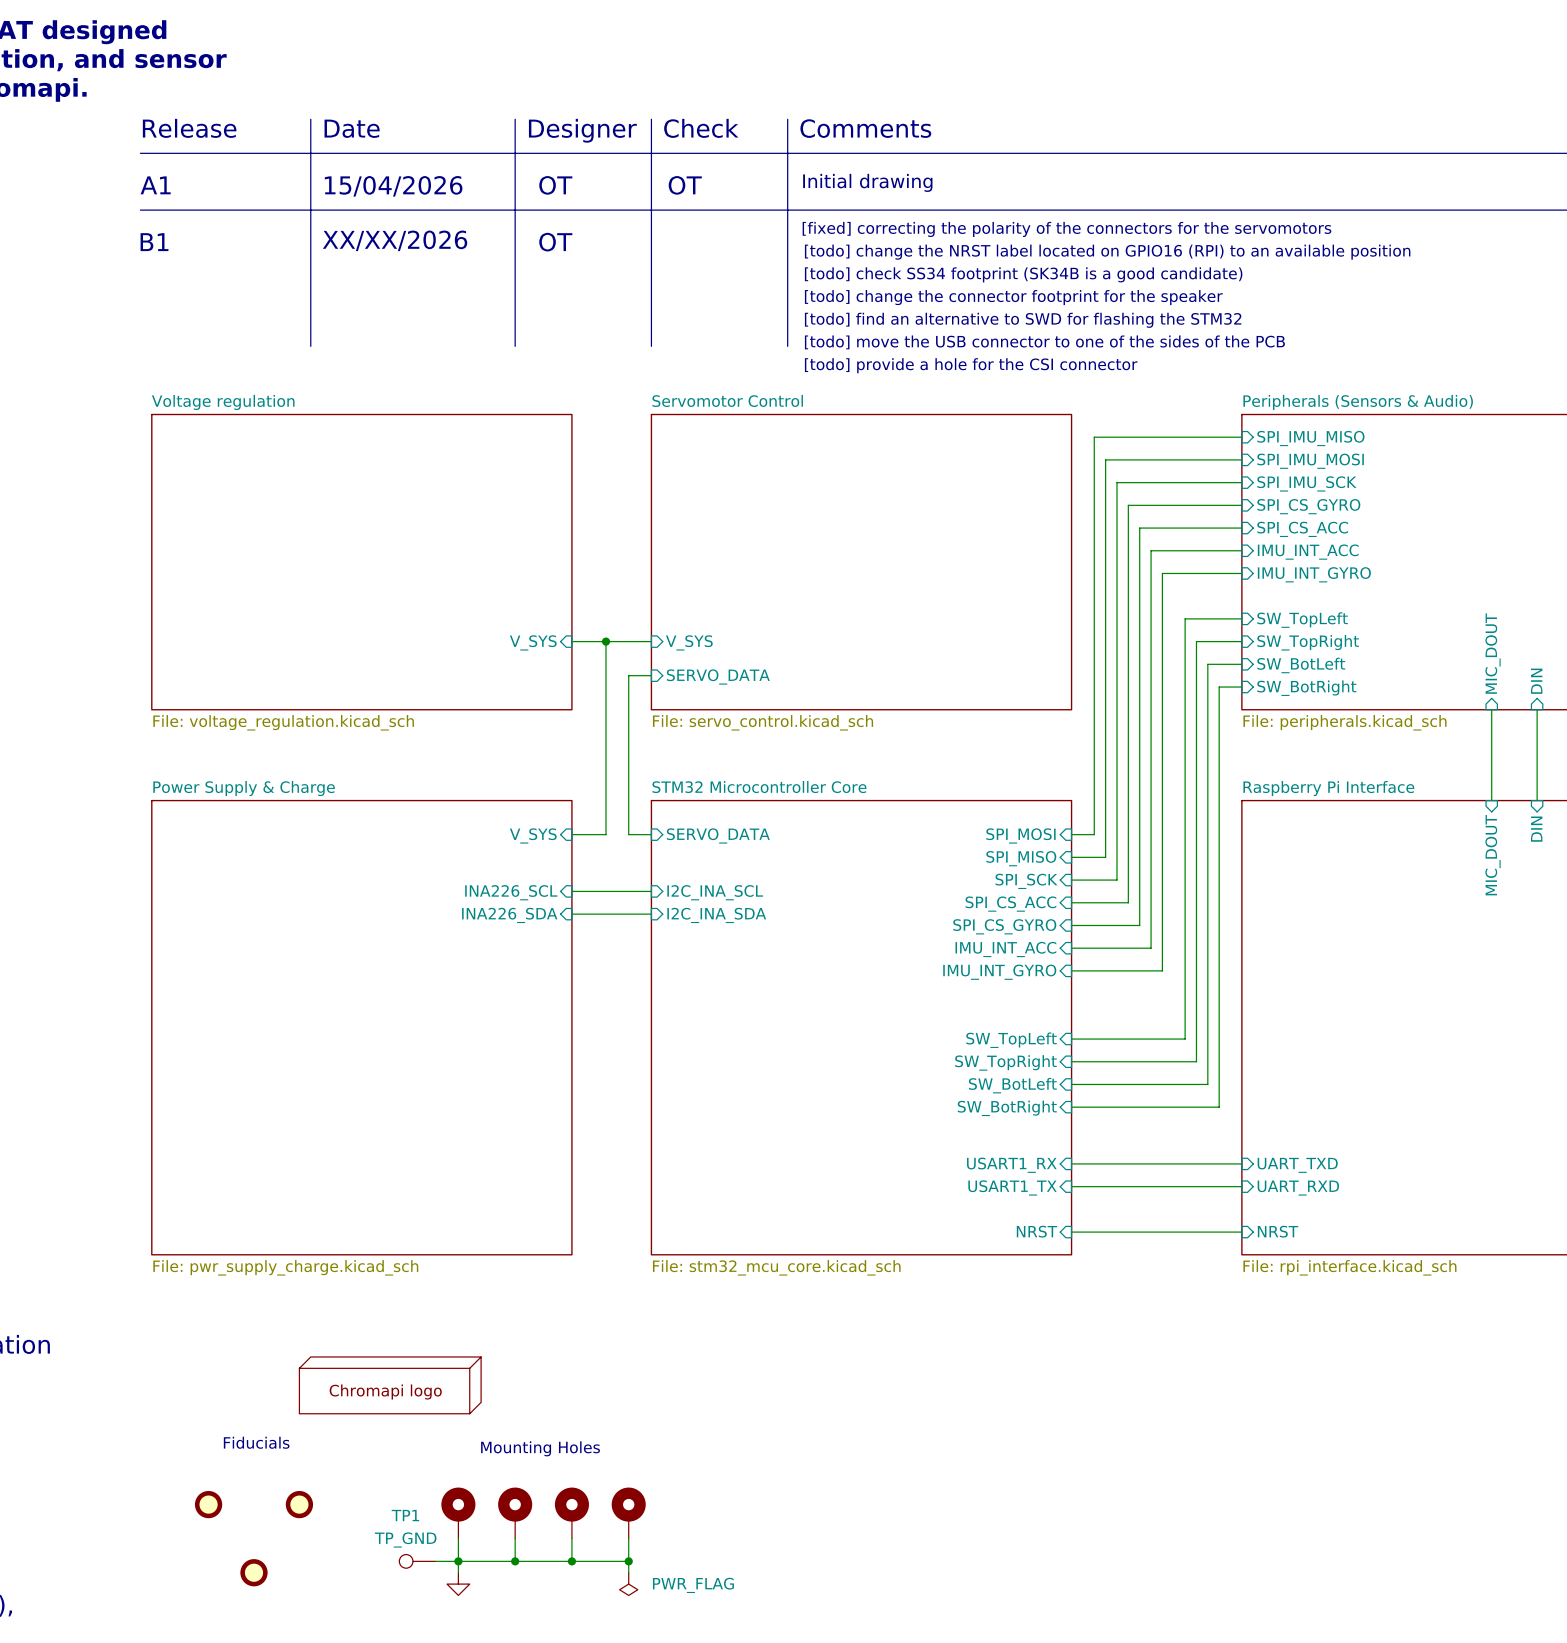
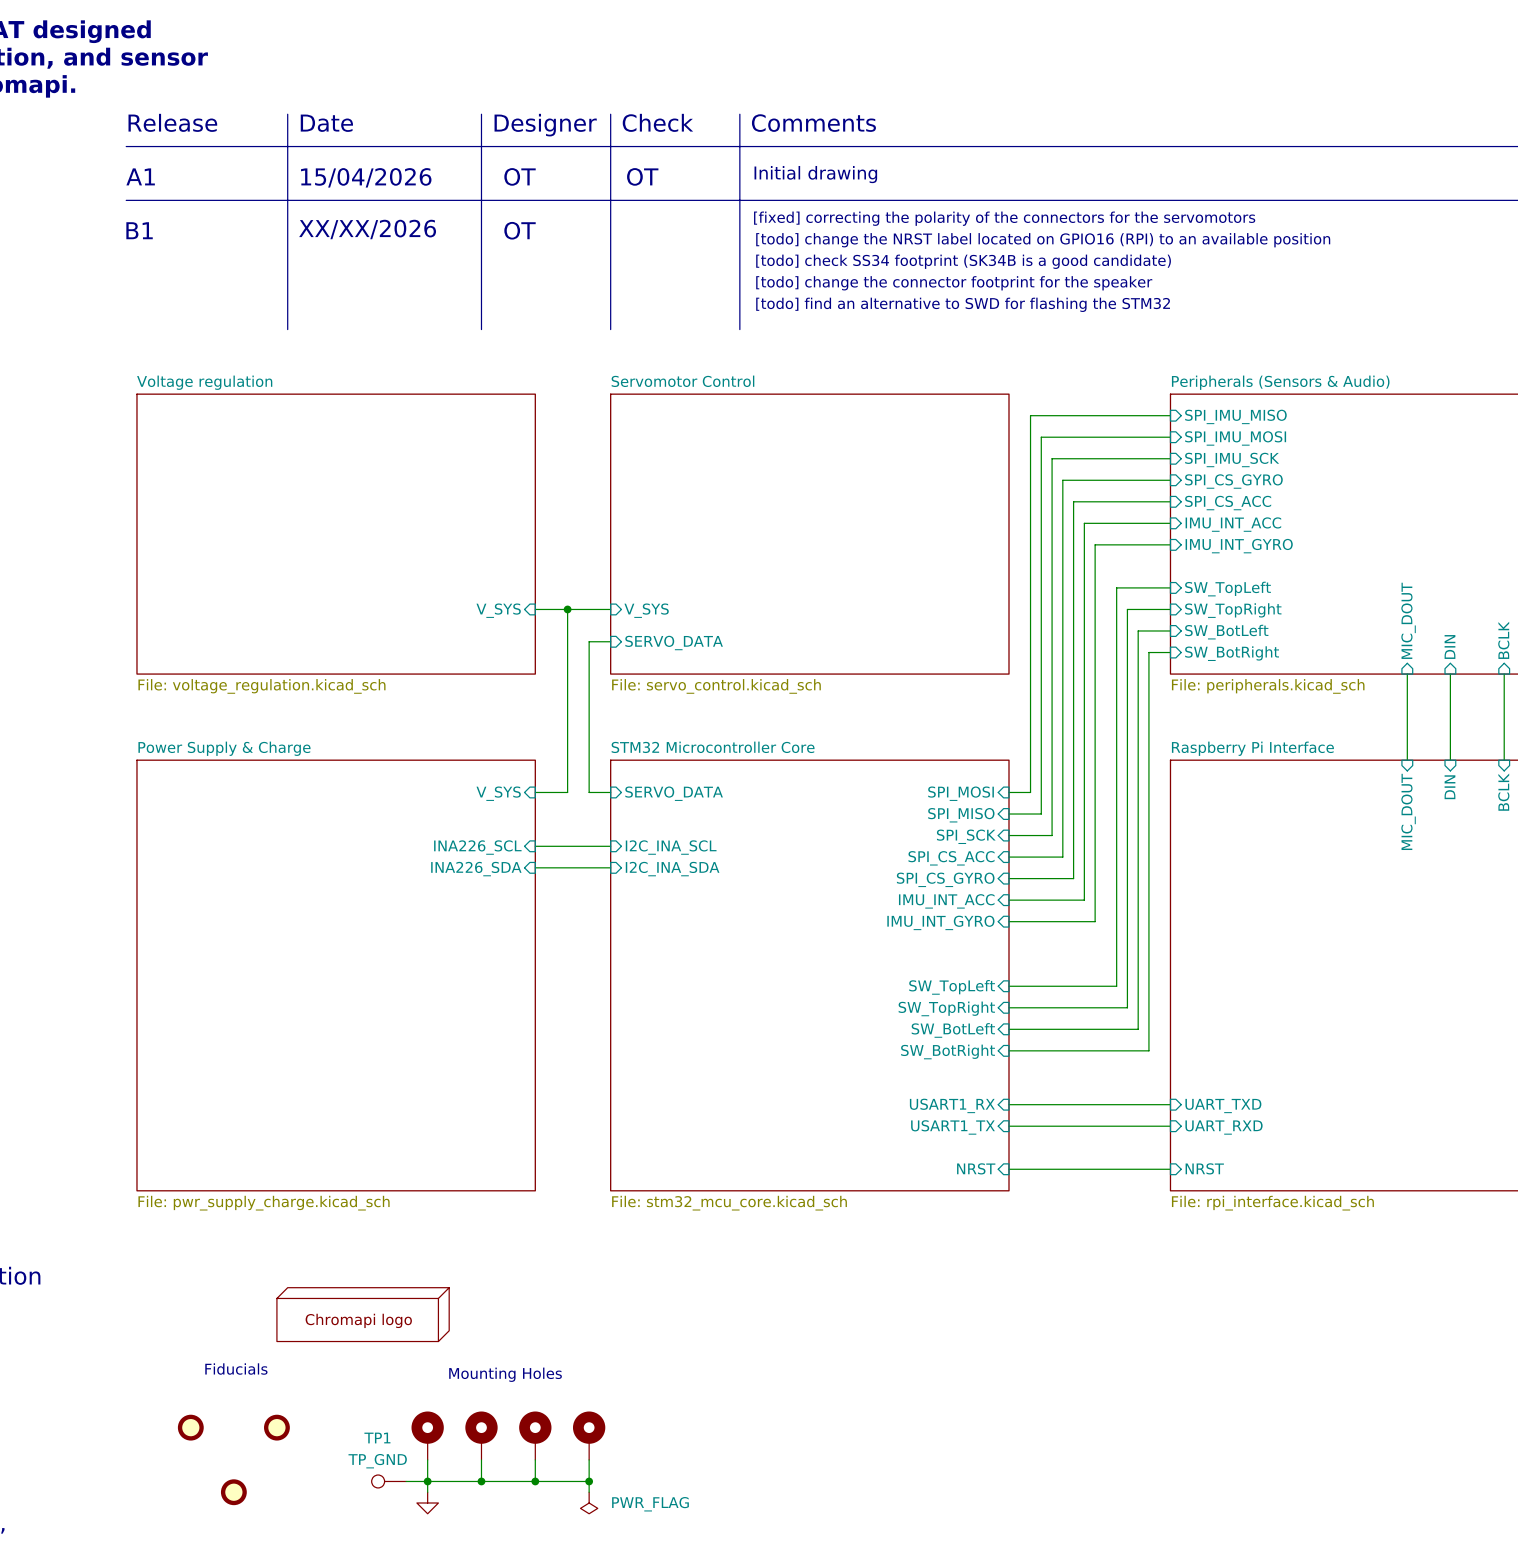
text: [todo] move the USB connector to one of the sides of the PCB (1044, 342) -> none
text: [todo] provide a hole for the CSI connector (971, 365) -> none

